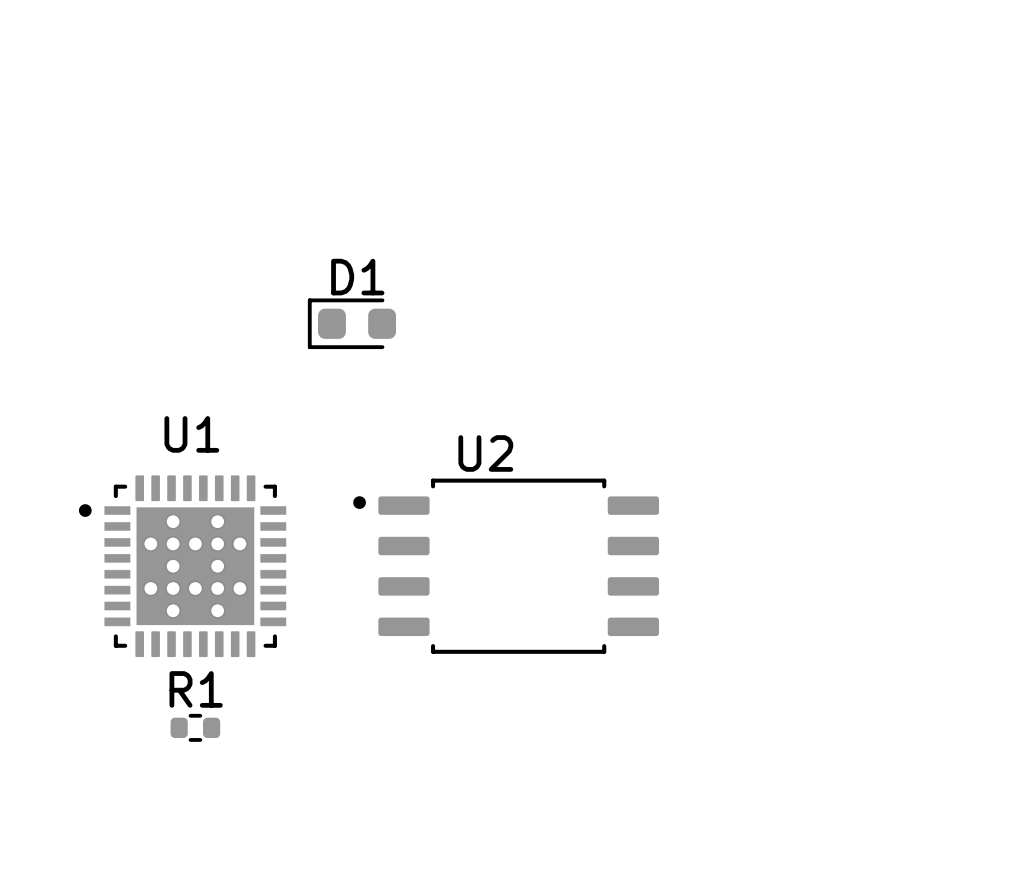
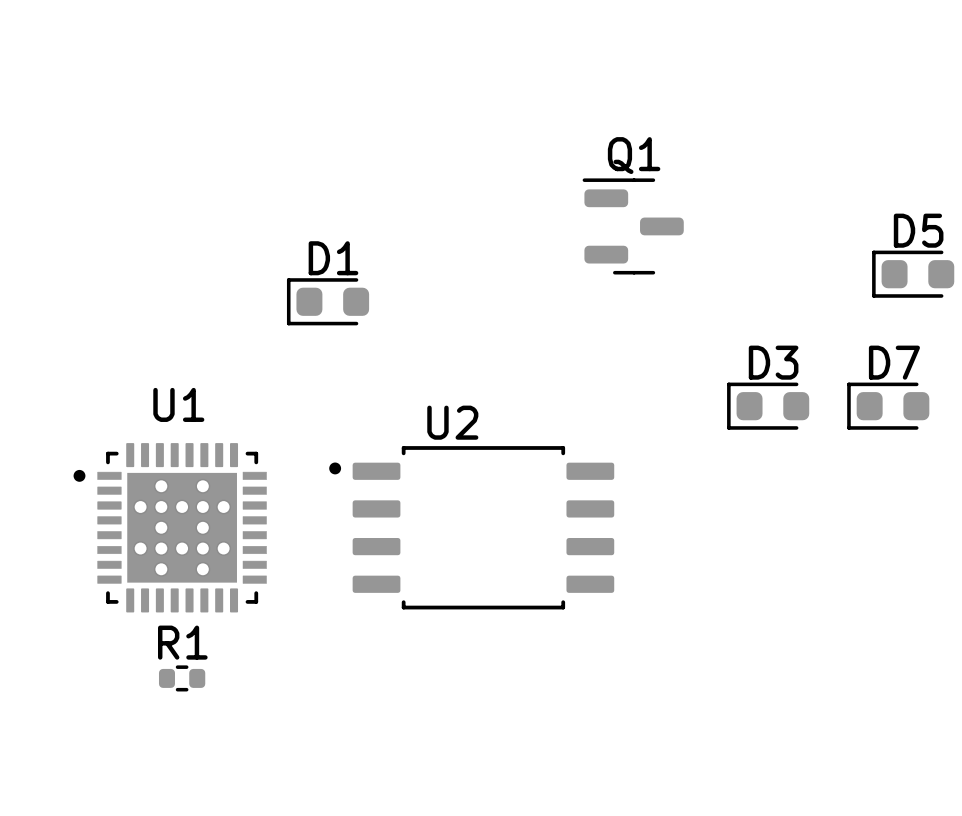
Q1: none -> (633, 226)
D5: none -> (913, 274)
D3: none -> (768, 406)
D7: none -> (888, 406)

